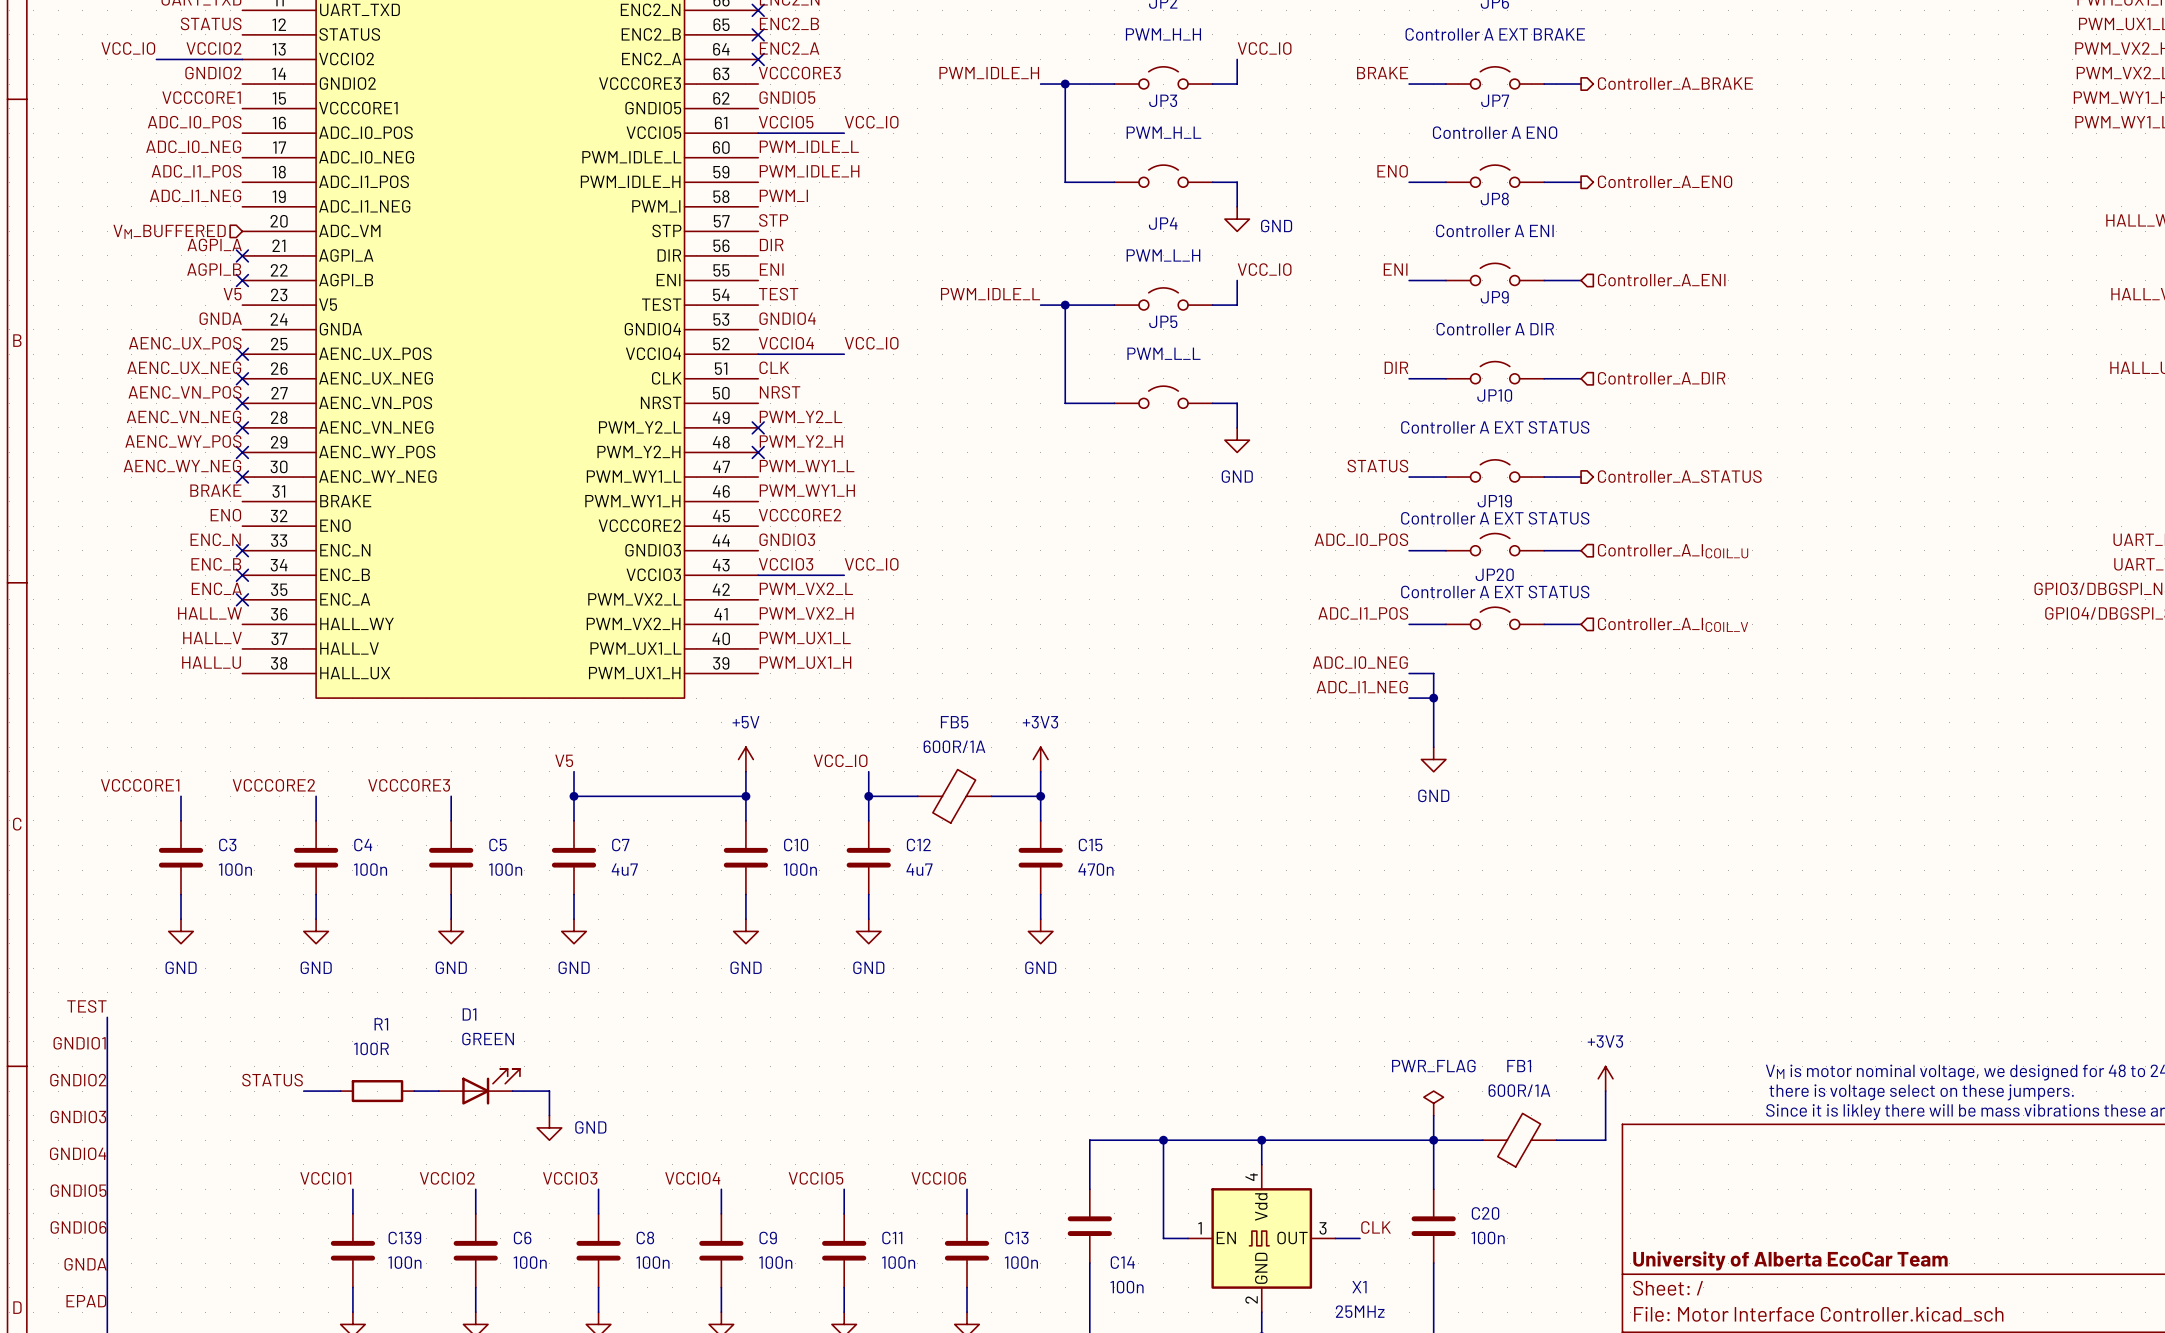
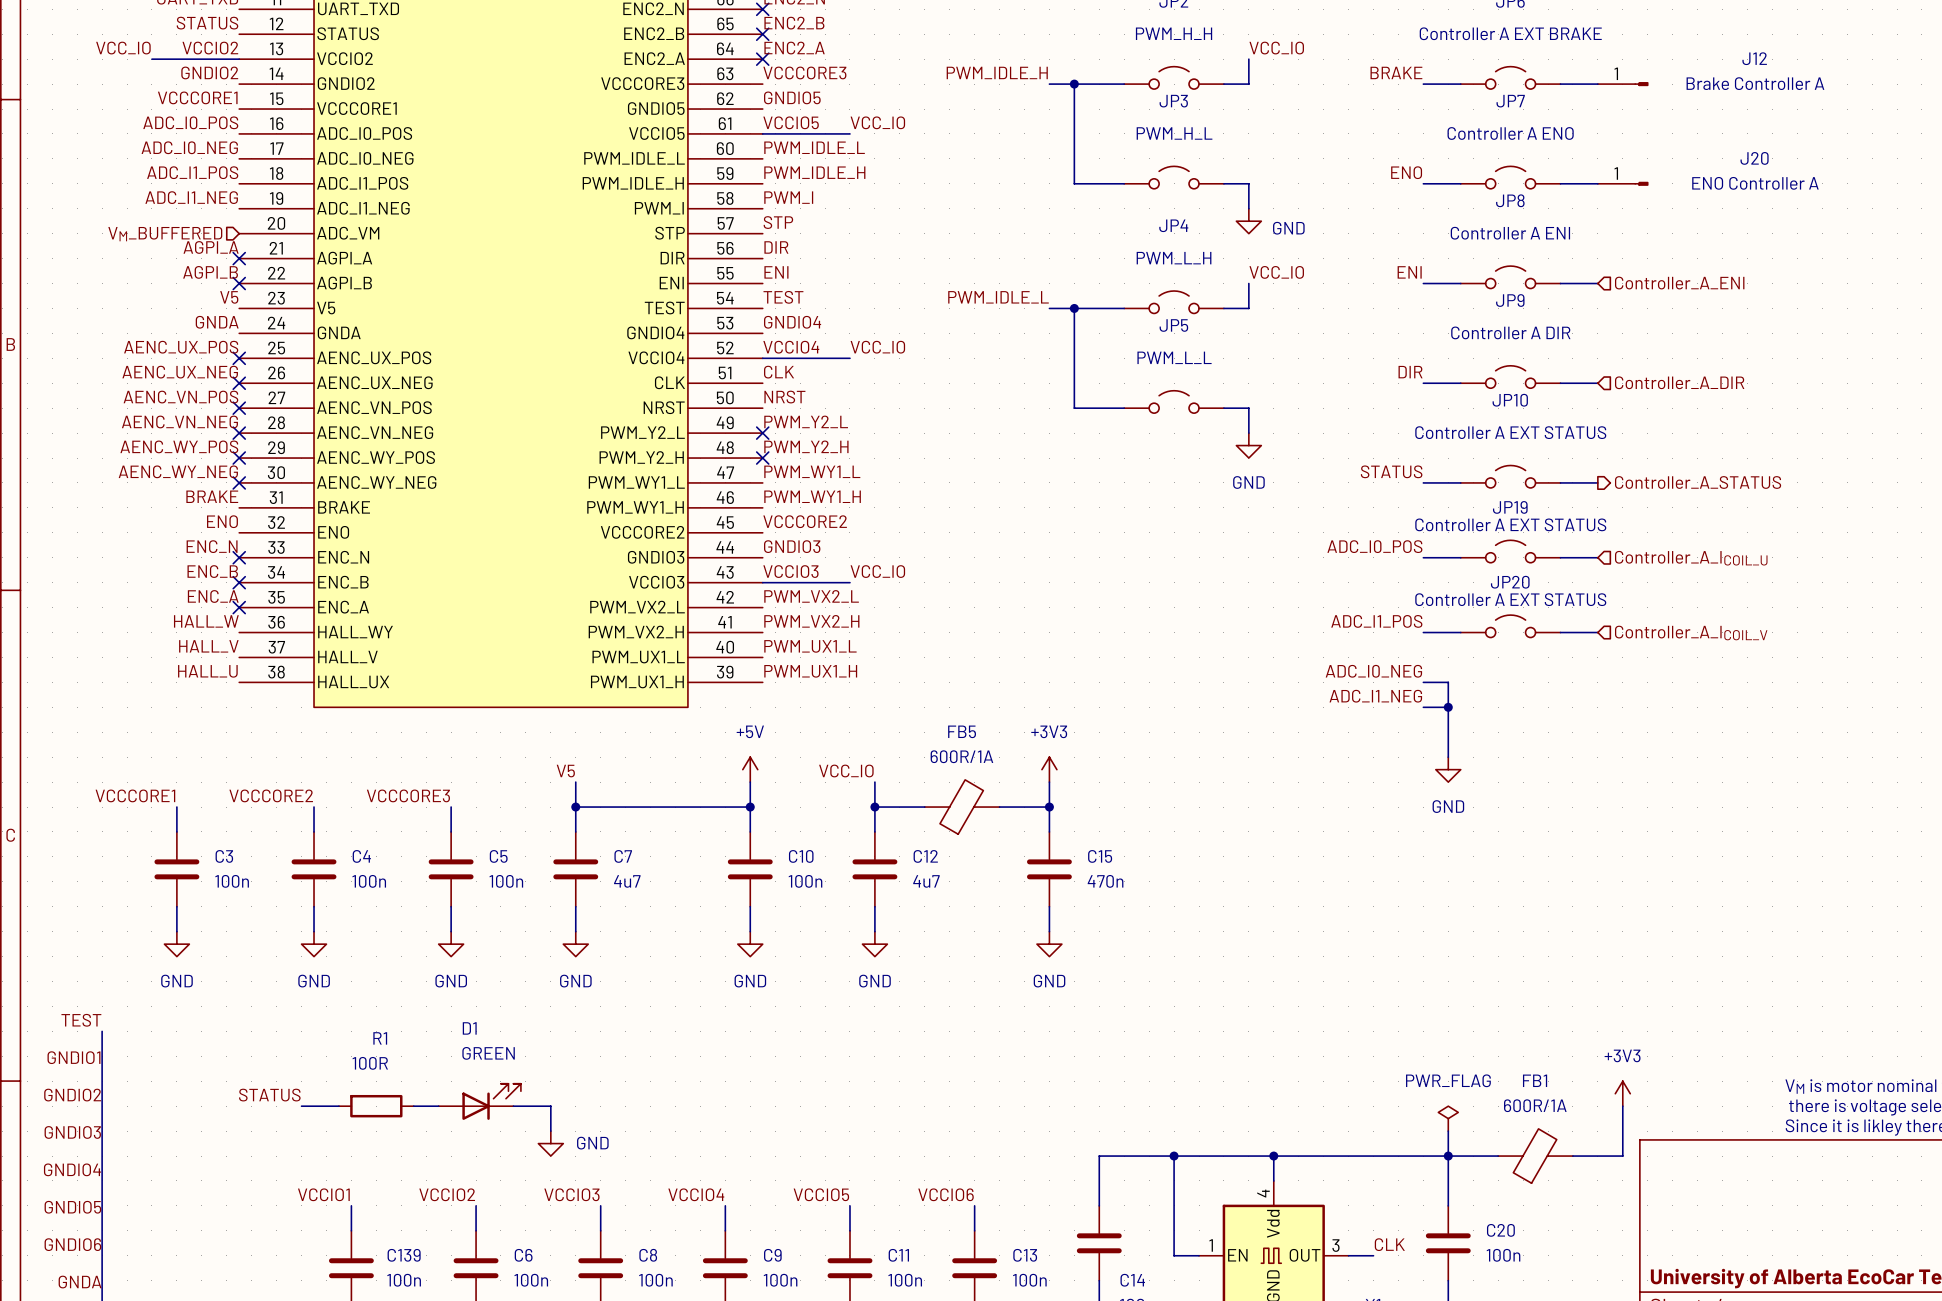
hierarchical label: Controller_A_BRAKE (1675, 83) -> none
J12: none -> Brake Controller A (1623, 84)
hierarchical label: Controller_A_ENO (1665, 181) -> none
J20: none -> ENO Controller A (1623, 183)

